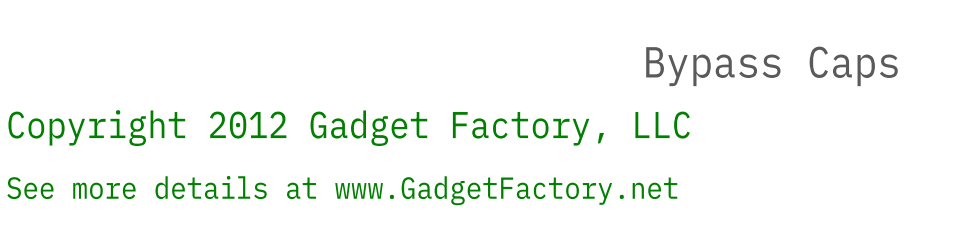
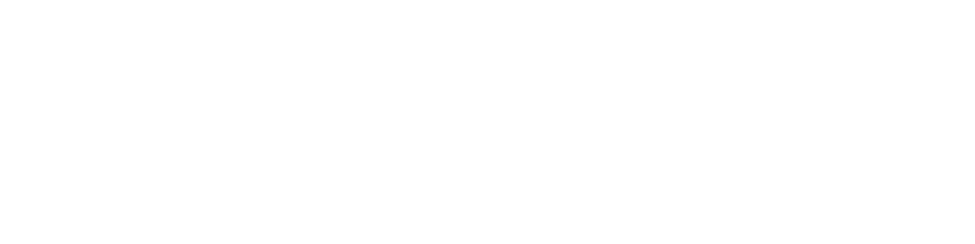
text: Bypass Caps (771, 66) -> none
text: Copyright 2012 Gadget Factory, LLC (349, 128) -> none
text: See more details at www.GadgetFactory.net (342, 190) -> none

